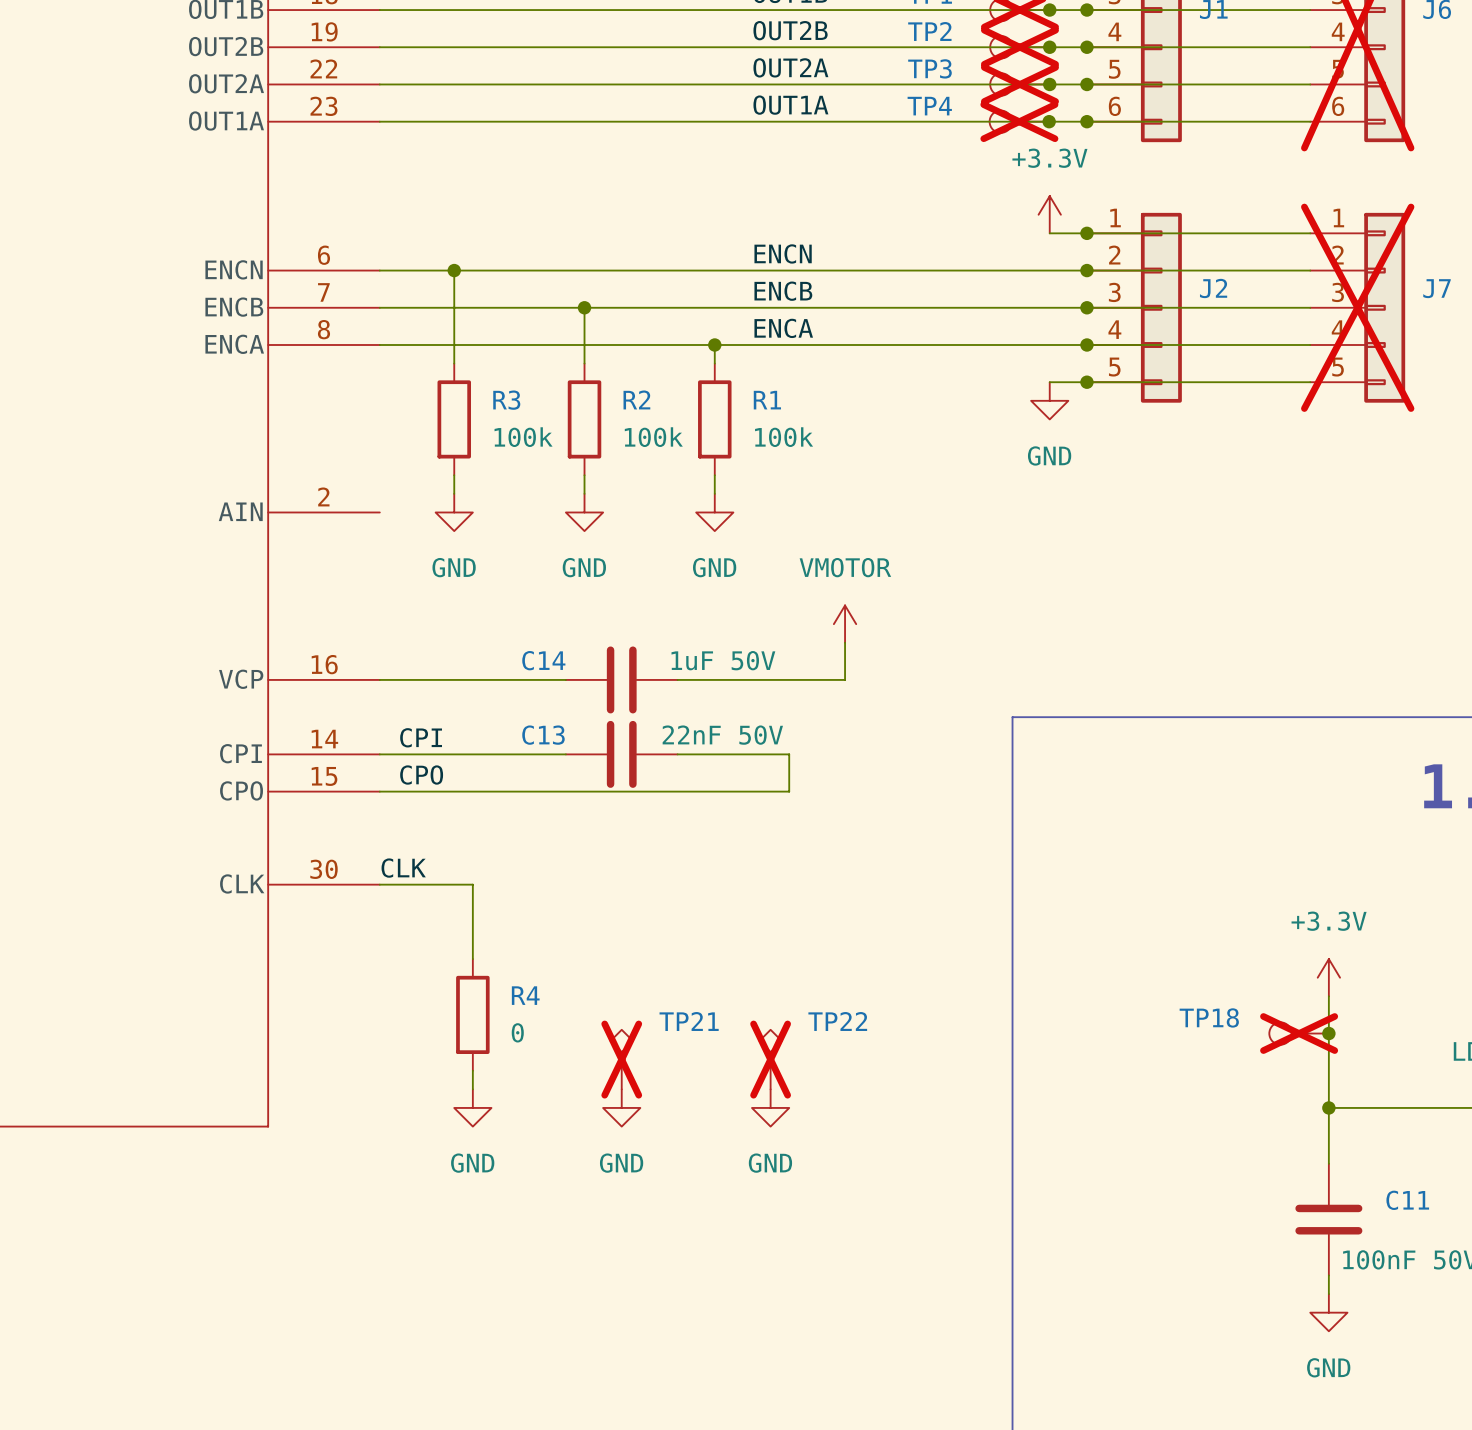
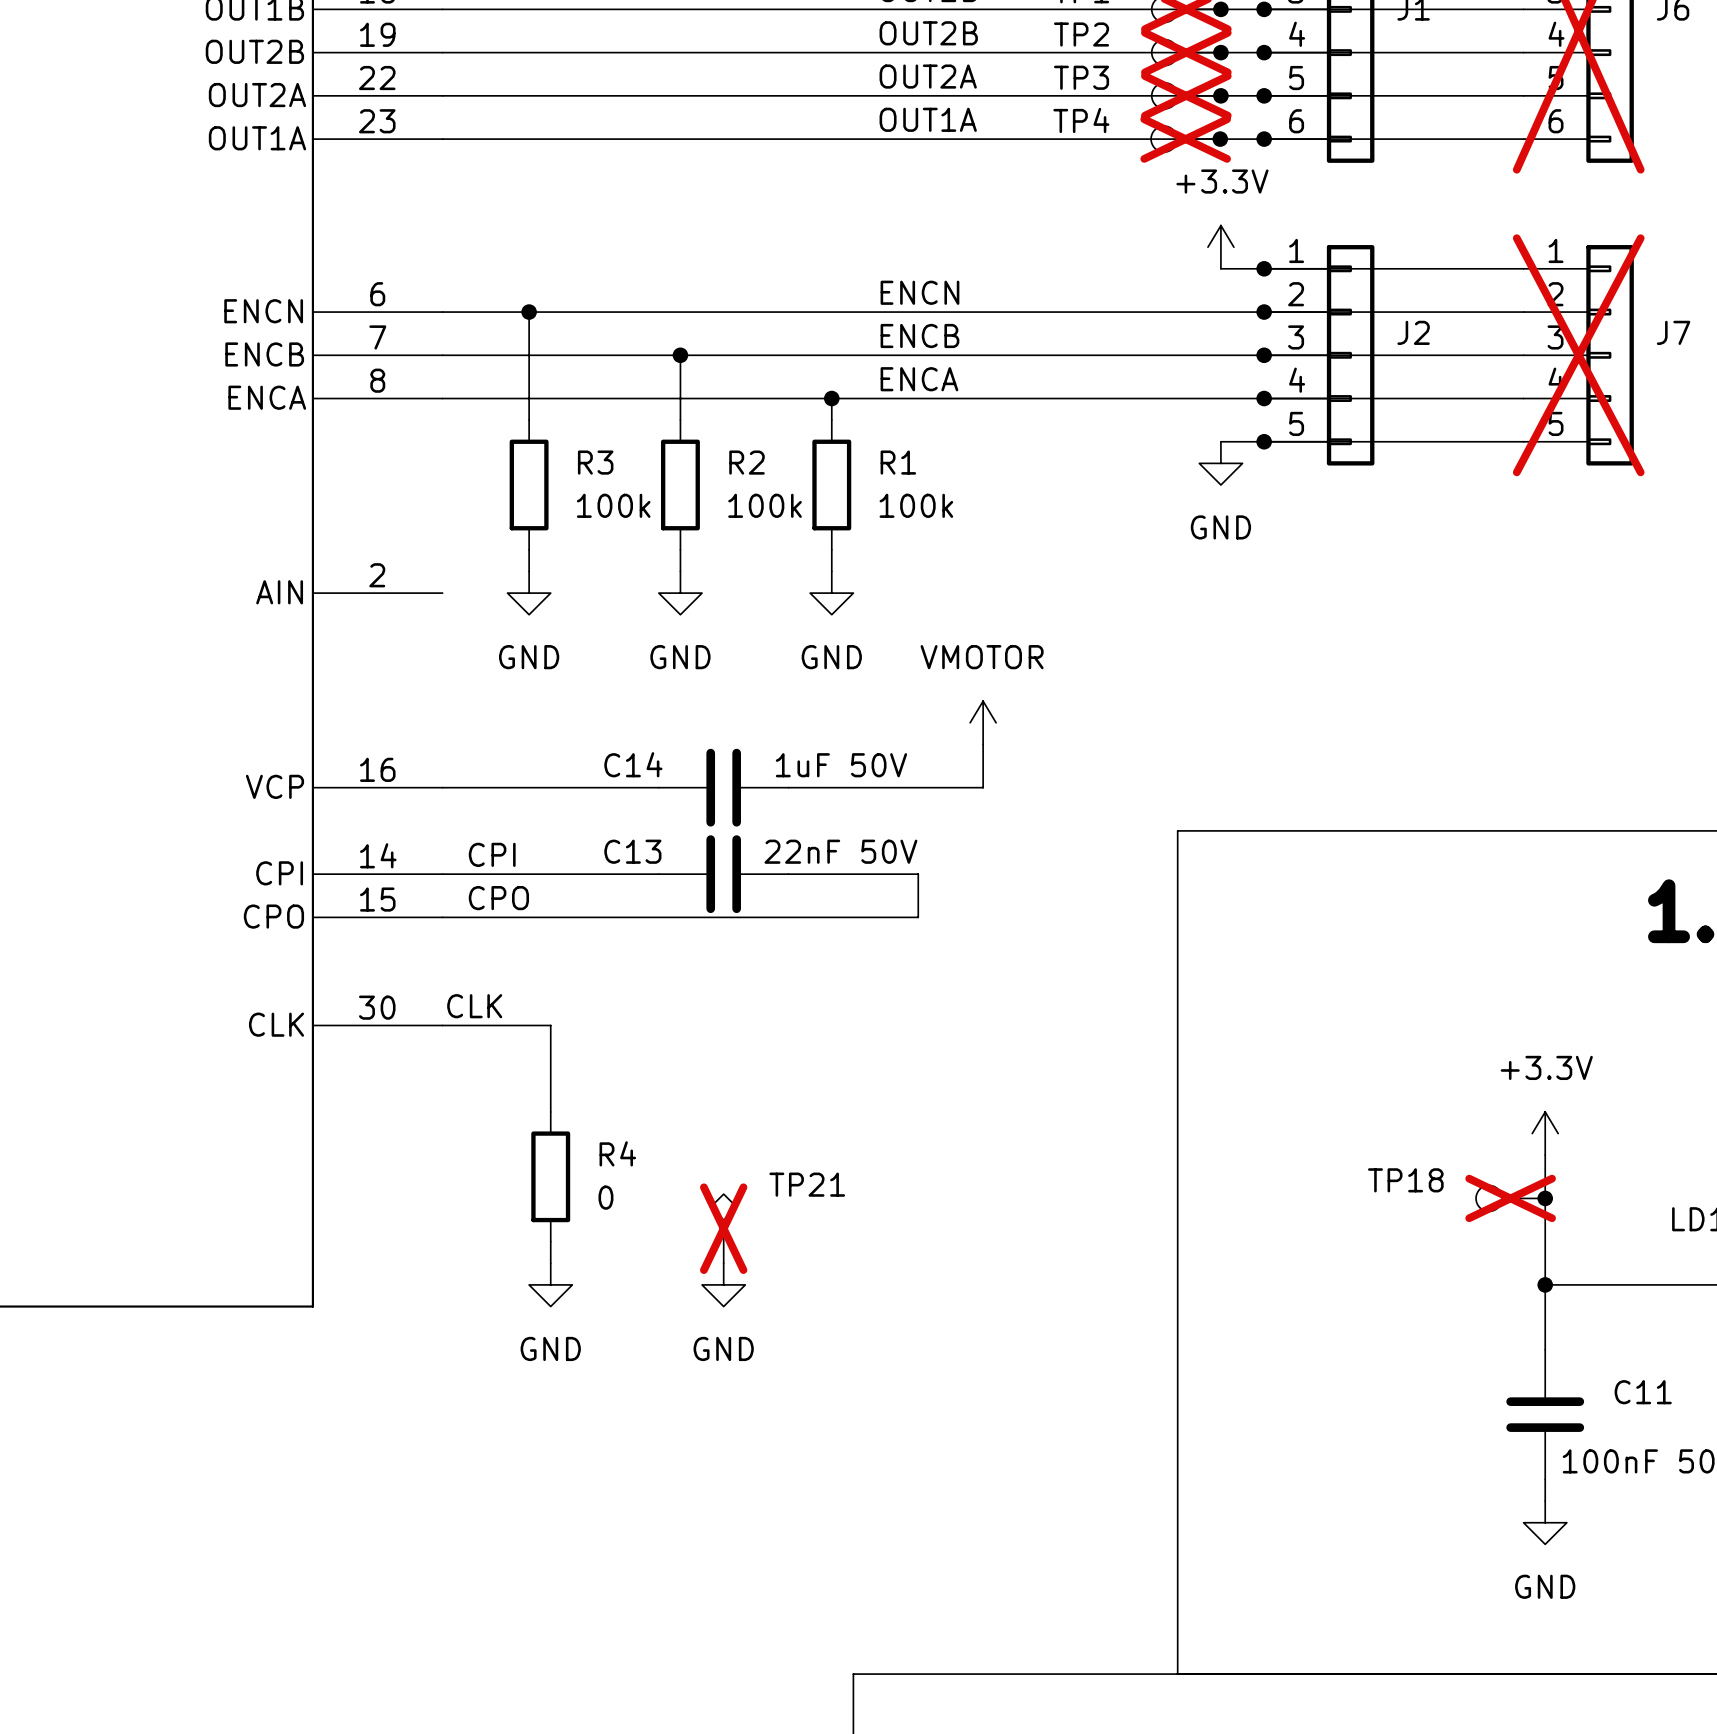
TP22: (770, 1059) -> none
power symbol: GND (770, 1107) -> none

